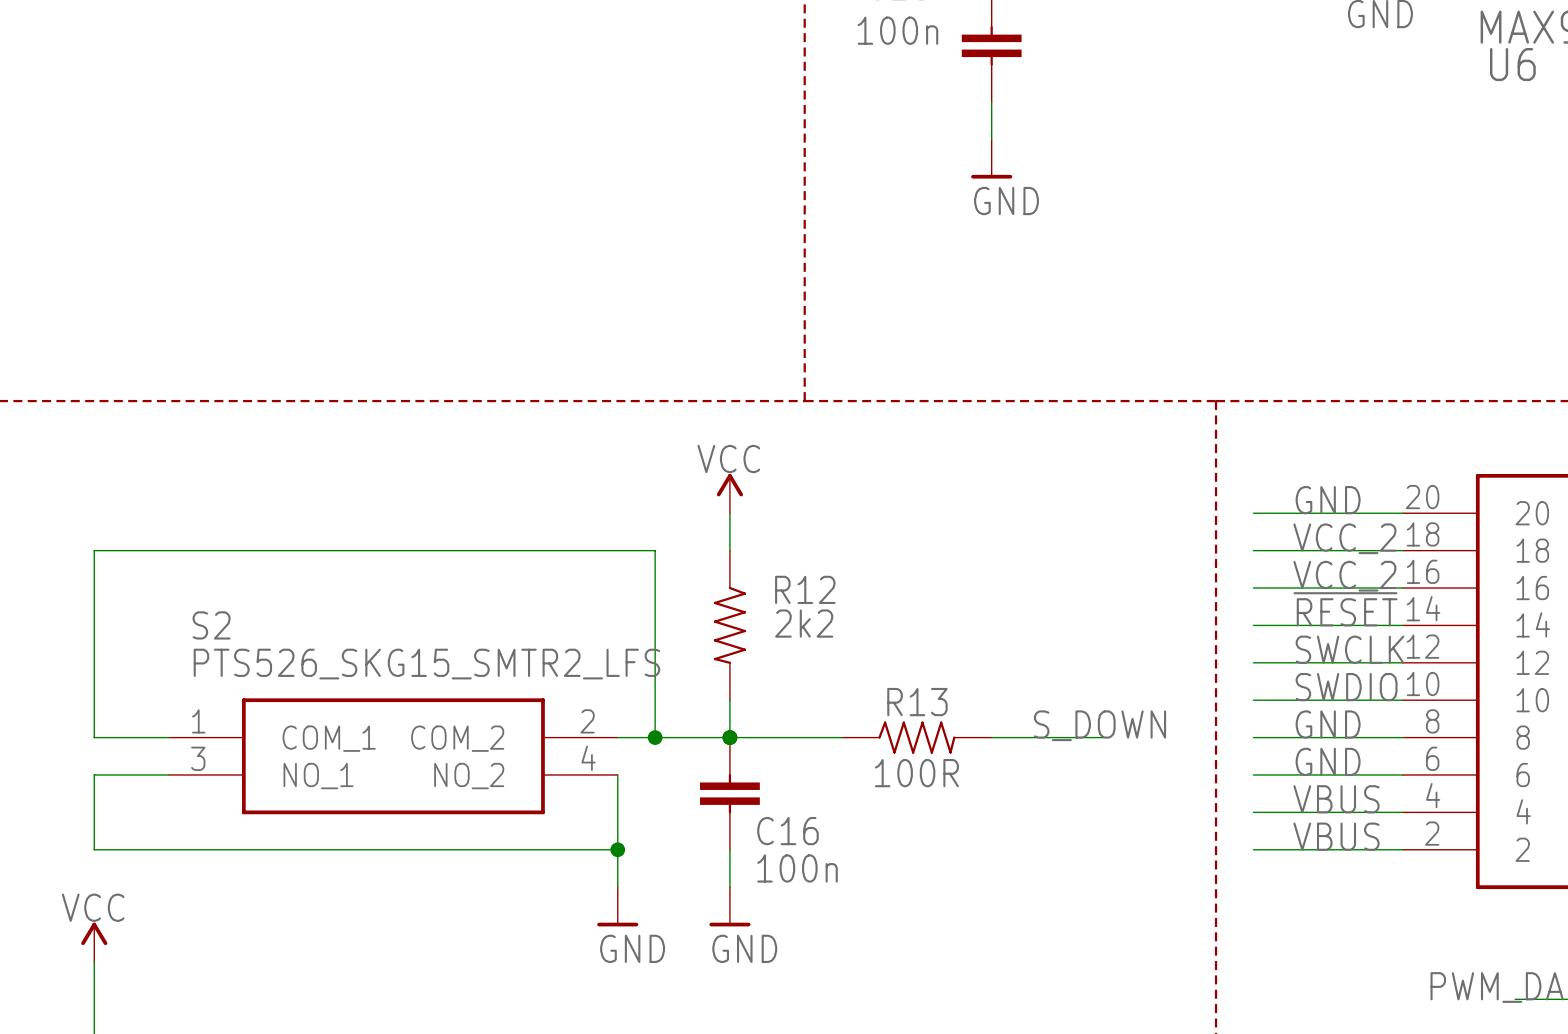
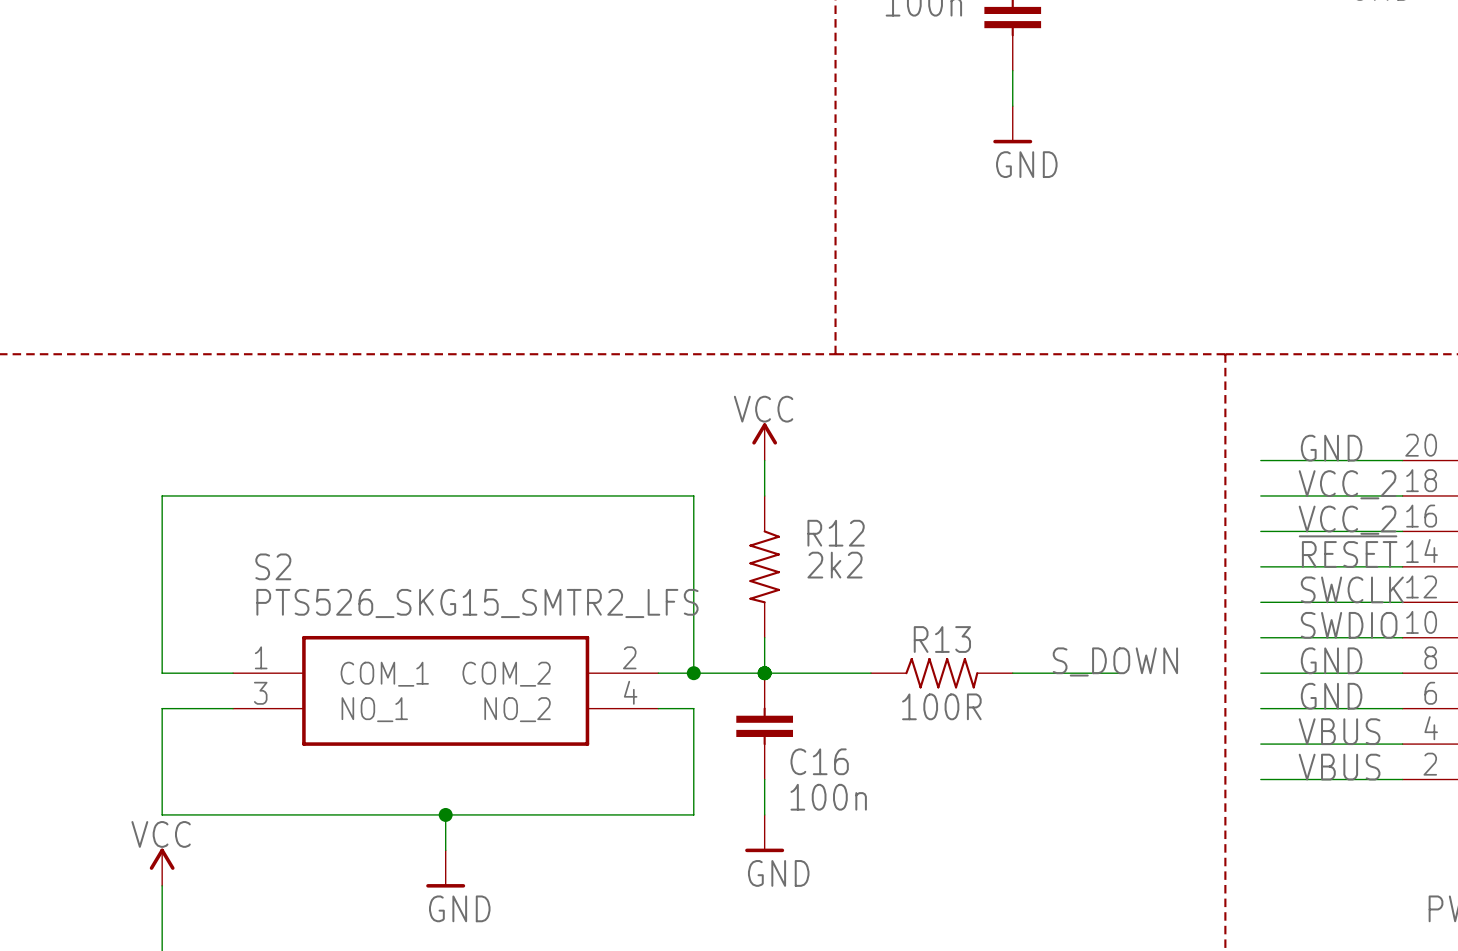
wire: (617, 774) (617, 887) -> none
wire: (94, 849) (617, 849) -> (162, 779) (162, 814) (693, 814) (693, 708) (658, 708)
junction: (617, 849) -> none
wire: none -> (445, 814) (445, 850)
junction: none -> (445, 814)
power symbol position: GND (617, 906) -> GND (445, 868)

